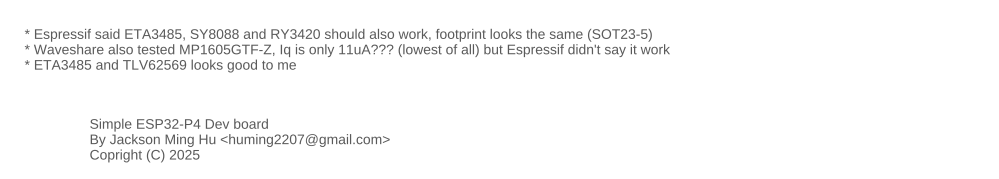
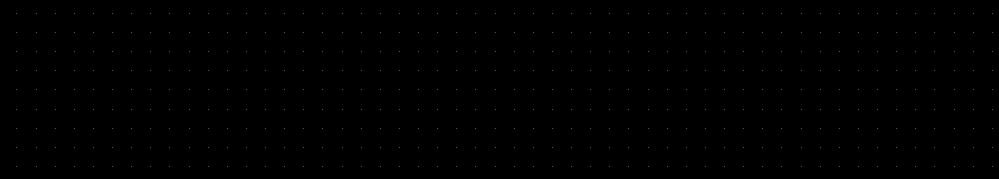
text: * Espressif said ETA3485, SY8088 and RY3420 should also work, footprint looks the same (SOT23-5) (338, 35) -> none
text: * Waveshare also tested MP1605GTF-Z, Iq is only 11uA??? (lowest of all) but Espressif didn't say it work (347, 50) -> none
text: * ETA3485 and TLV62569 looks good to me (160, 66) -> none
text: Simple ESP32-P4 Dev board (179, 125) -> none
text: By Jackson Ming Hu <huming2207@gmail.com> (240, 140) -> none
text: Copright (C) 2025 (144, 155) -> none

